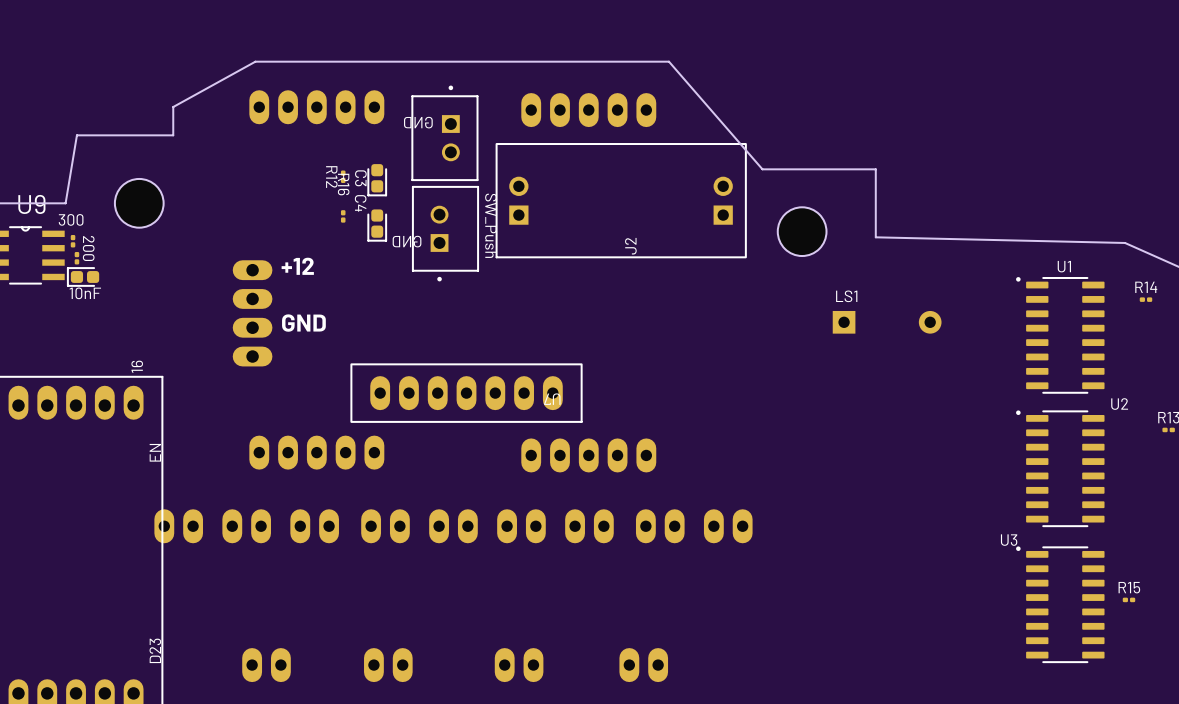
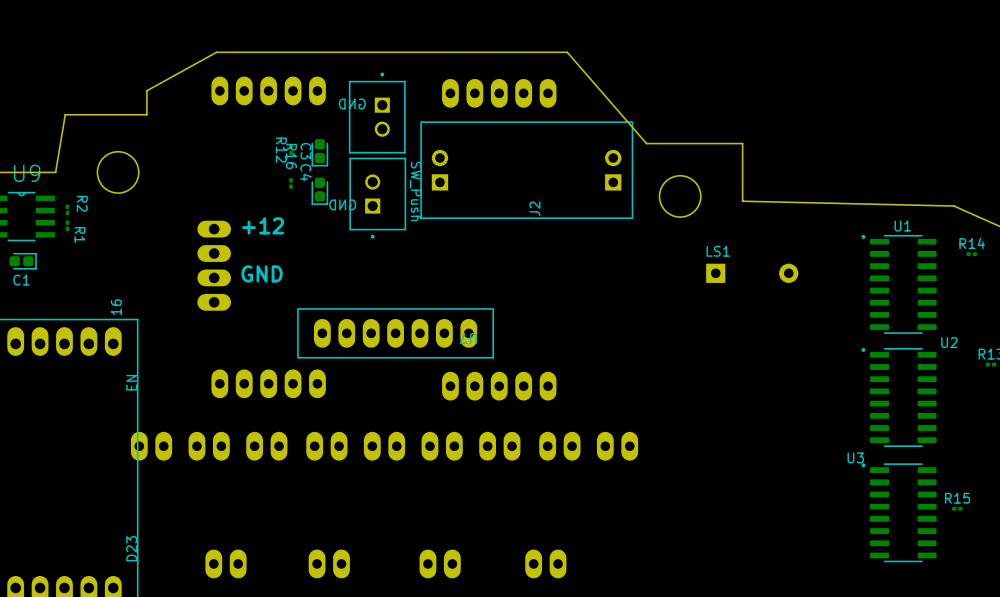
part: 300 (73, 241) -> none
R2: none -> (67, 209)
part: 200 (76, 258) -> none
R1: none -> (67, 225)
part: 10nF (83, 276) -> none
C1: none -> (23, 261)

